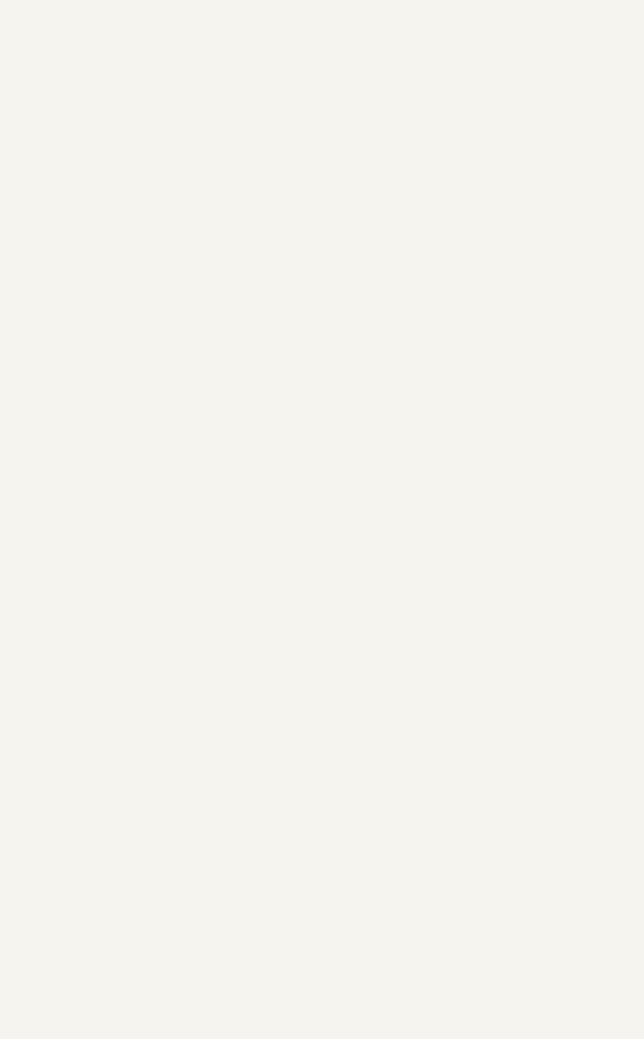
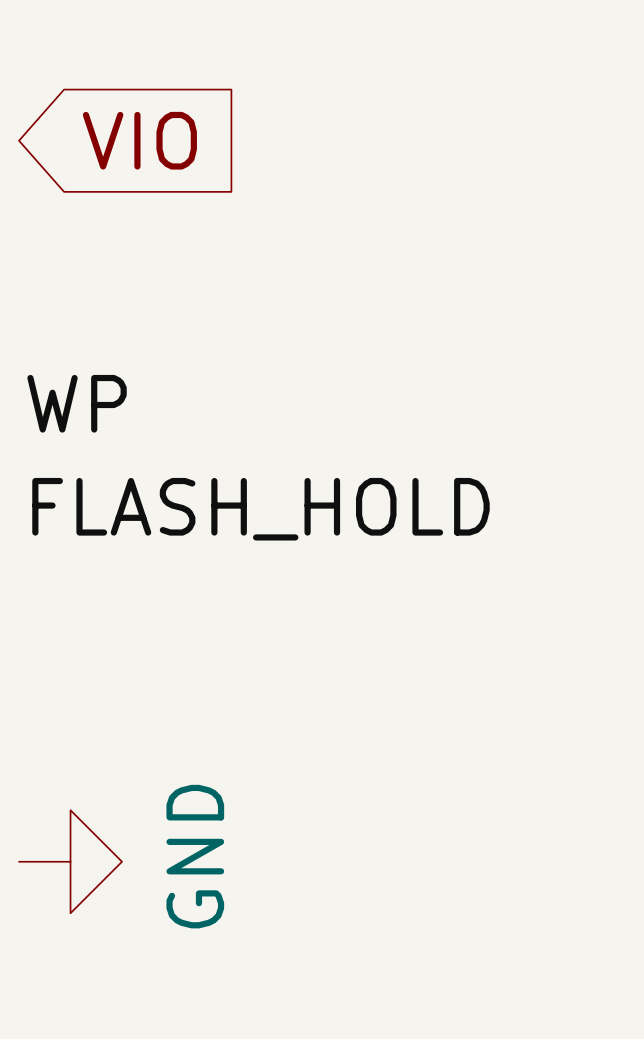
global label: none -> VIO (139, 140)
label: none -> WP (77, 403)
label: none -> FLASH_HOLD (260, 509)
power symbol: none -> GND (70, 861)

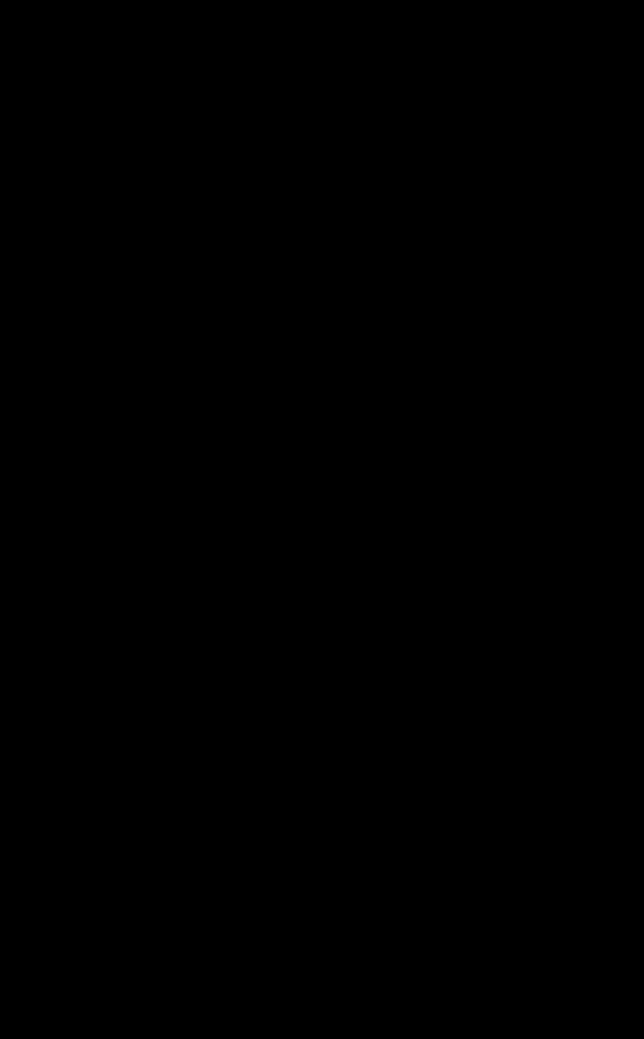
global label: VIO (139, 140) -> none
label: WP (77, 403) -> none
label: FLASH_HOLD (260, 509) -> none
power symbol: GND (70, 861) -> none

